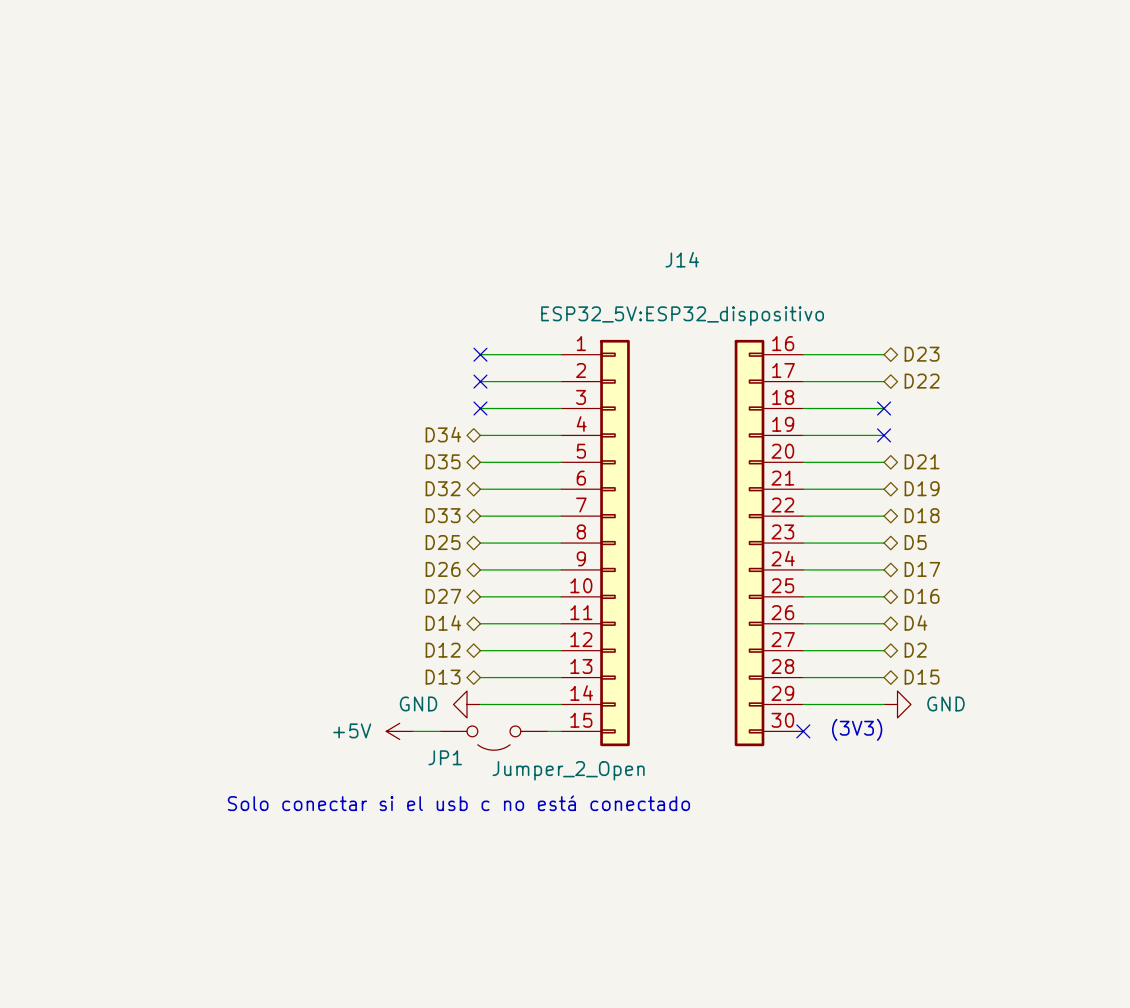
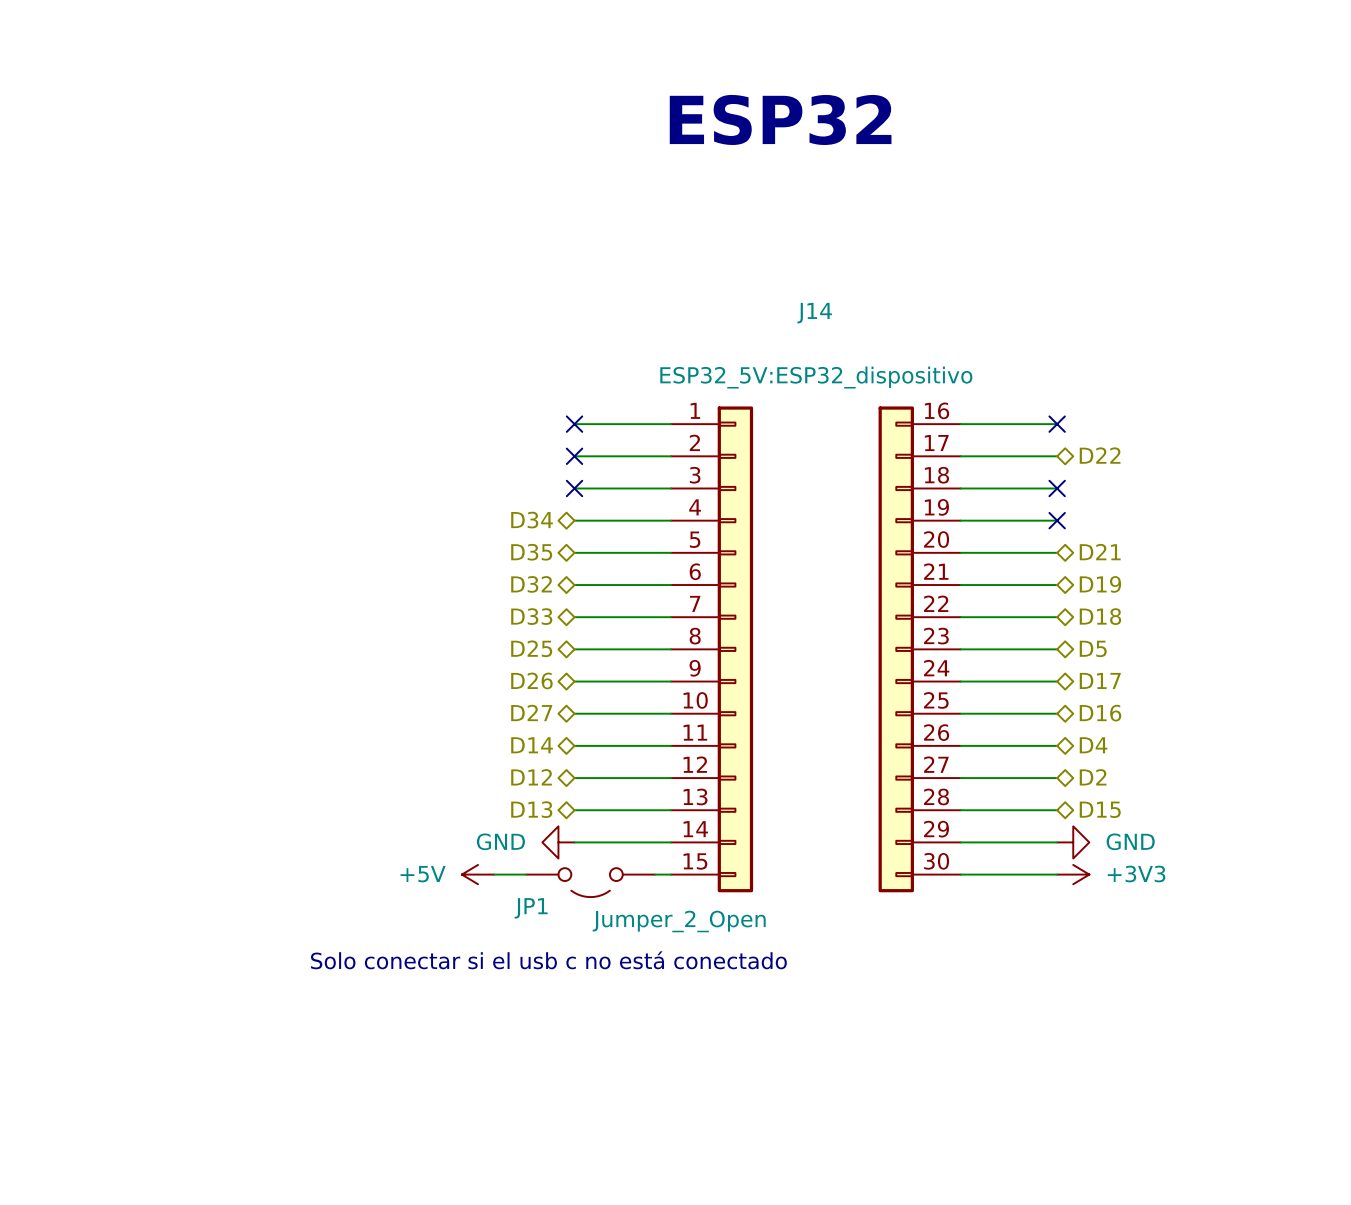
text: none -> ESP32 (780, 119)
no-connect mark: none -> (1057, 424)
hierarchical label: D23 (922, 354) -> none
text: (3V3) (857, 729) -> none
wire: none -> (960, 874) (1057, 874)
no-connect mark: (803, 731) -> none
power symbol: none -> +3V3 (1073, 874)

